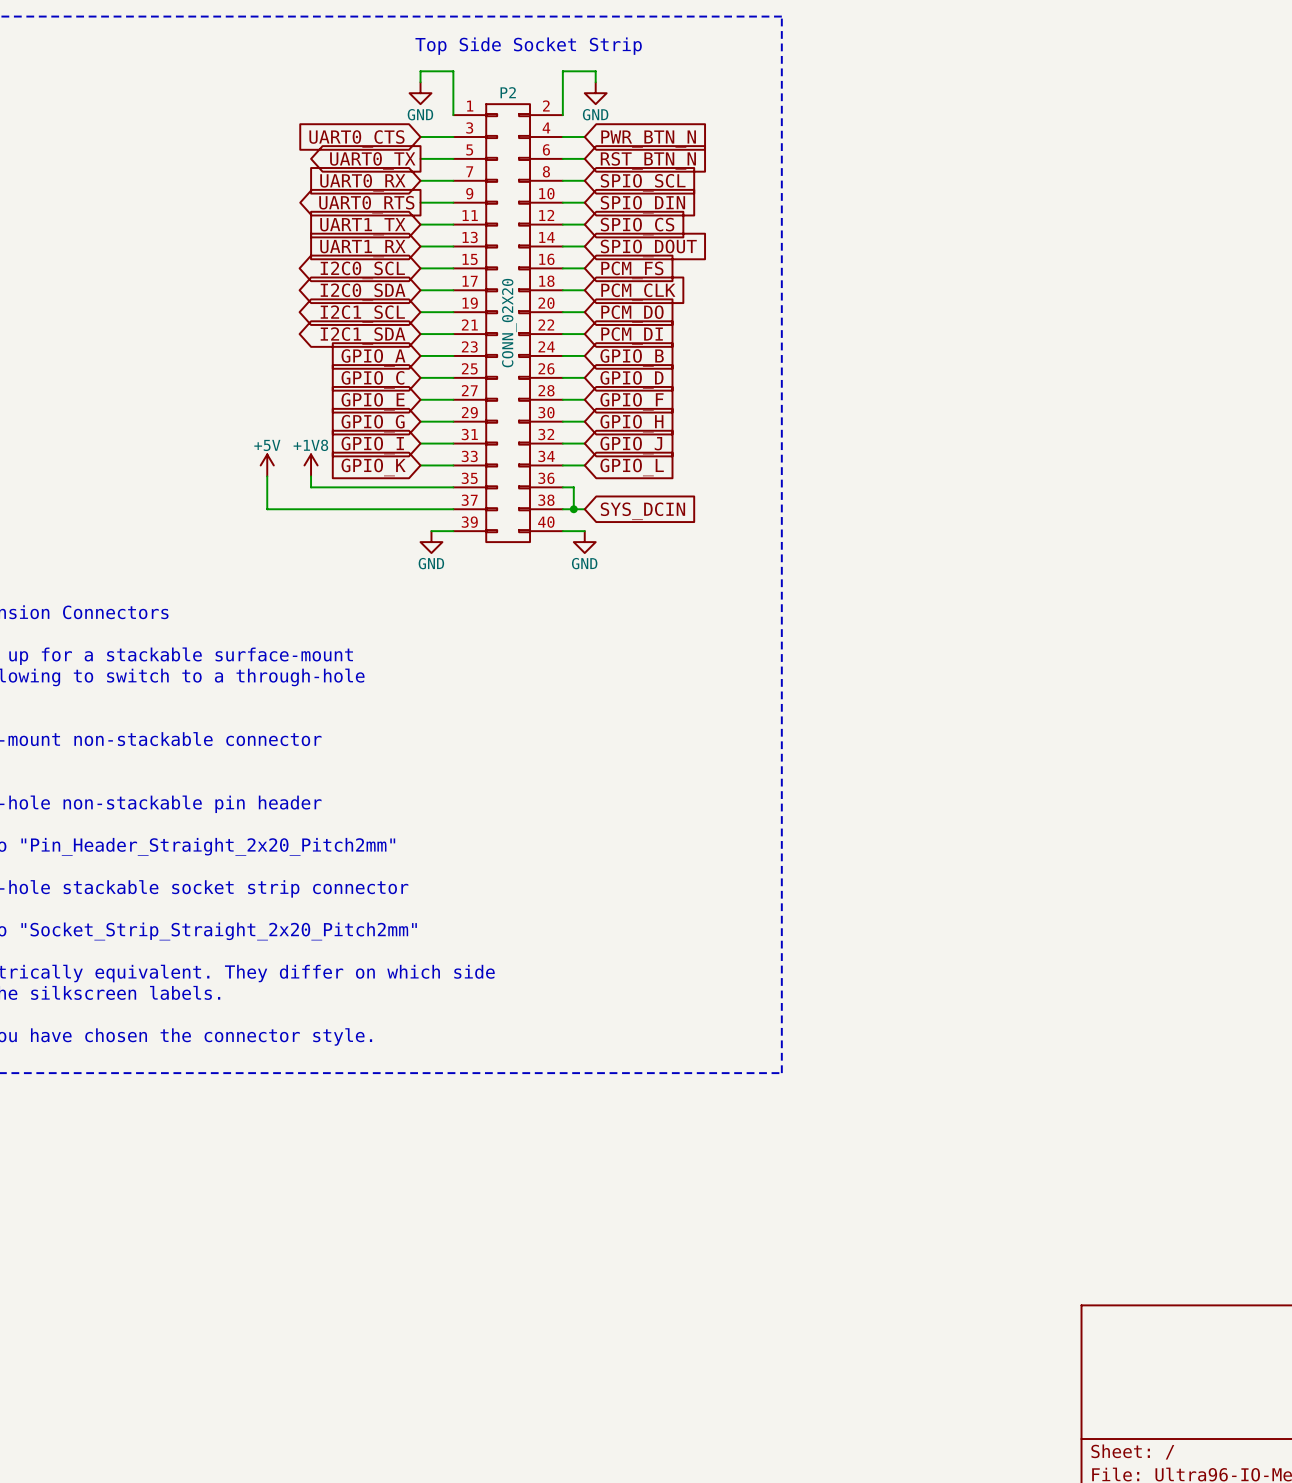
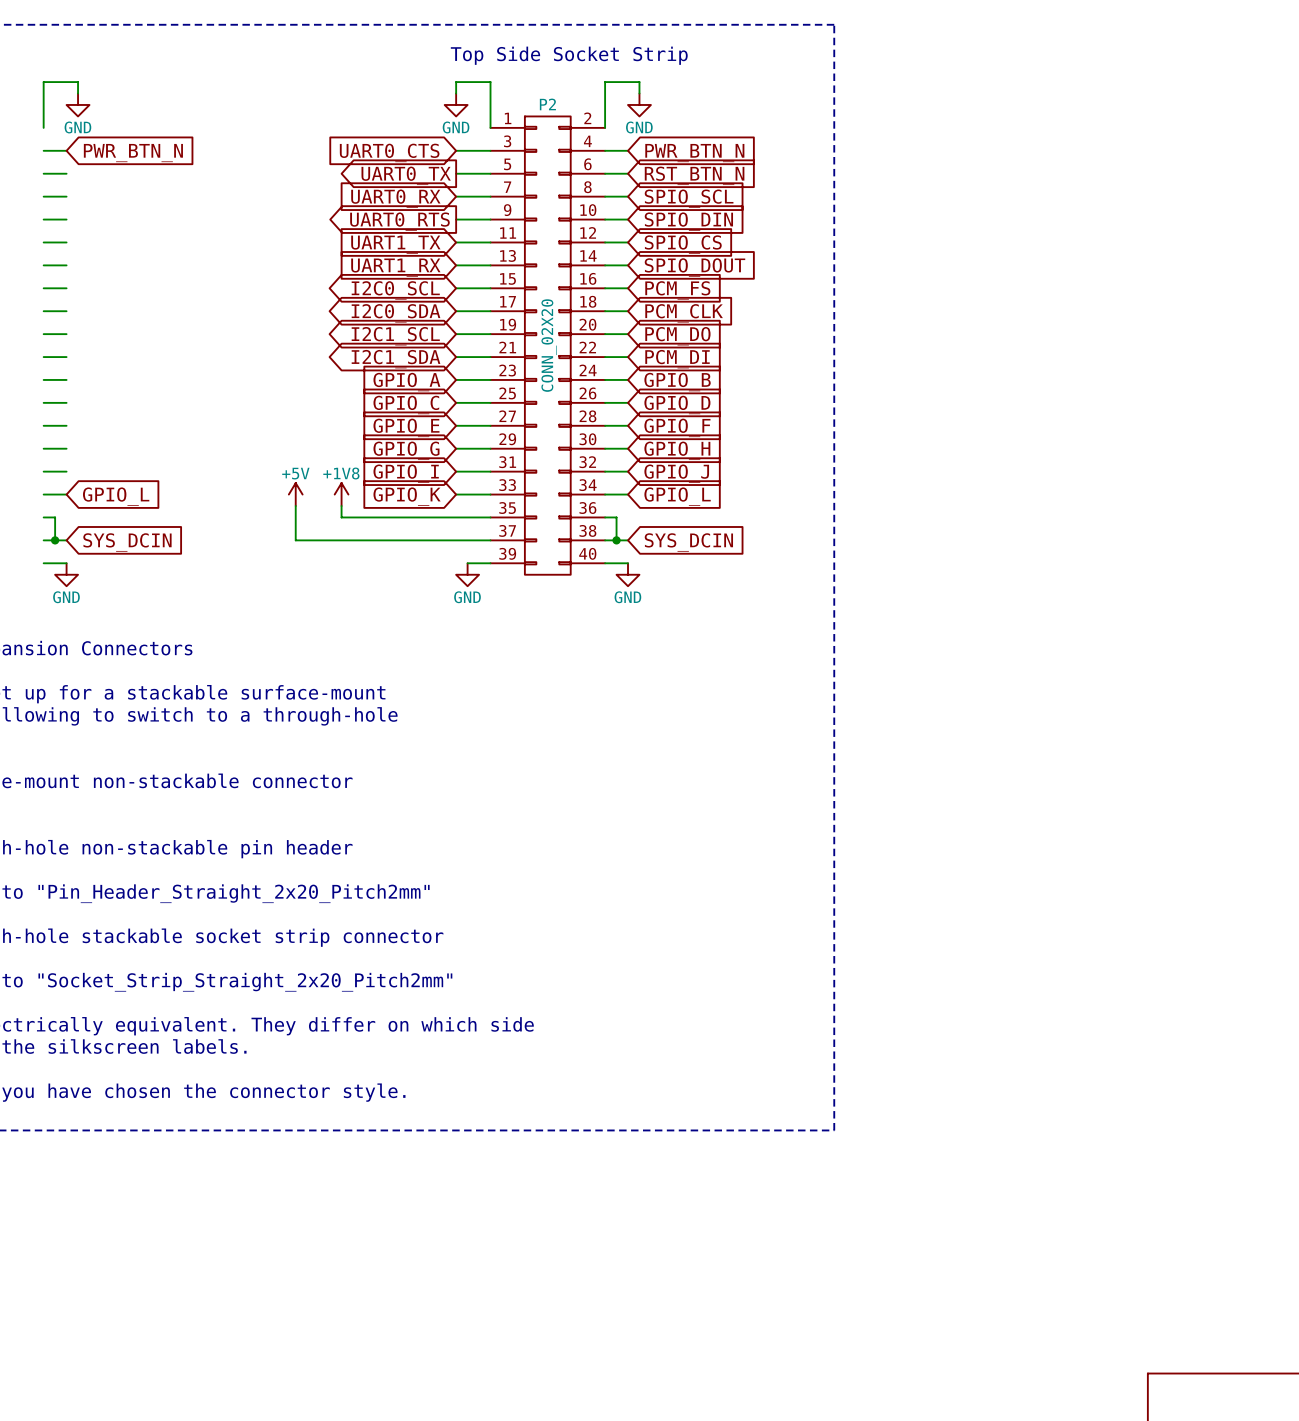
wire: none -> (78, 93) (78, 82) (43, 82) (43, 127)
power symbol: none -> GND (78, 104)
wire: none -> (43, 150) (66, 150)
global label: none -> PWR_BTN_N (133, 153)
wire: none -> (43, 173) (66, 173)
wire: none -> (43, 196) (66, 196)
wire: none -> (43, 219) (66, 219)
wire: none -> (43, 242) (66, 242)
wire: none -> (43, 265) (66, 265)
wire: none -> (43, 288) (66, 288)
wire: none -> (43, 311) (66, 311)
wire: none -> (43, 334) (66, 334)
wire: none -> (43, 357) (66, 357)
wire: none -> (43, 379) (66, 379)
wire: none -> (43, 402) (66, 402)
wire: none -> (43, 425) (66, 425)
wire: none -> (43, 448) (66, 448)
wire: none -> (43, 471) (66, 471)
wire: none -> (43, 494) (66, 494)
global label: none -> GPIO_L (116, 496)
wire: none -> (43, 517) (55, 517) (55, 540)
wire: none -> (43, 540) (66, 540)
junction: none -> (55, 540)
global label: none -> SYS_DCIN (127, 542)
wire: none -> (43, 563) (66, 563)
power symbol: none -> GND (66, 574)

